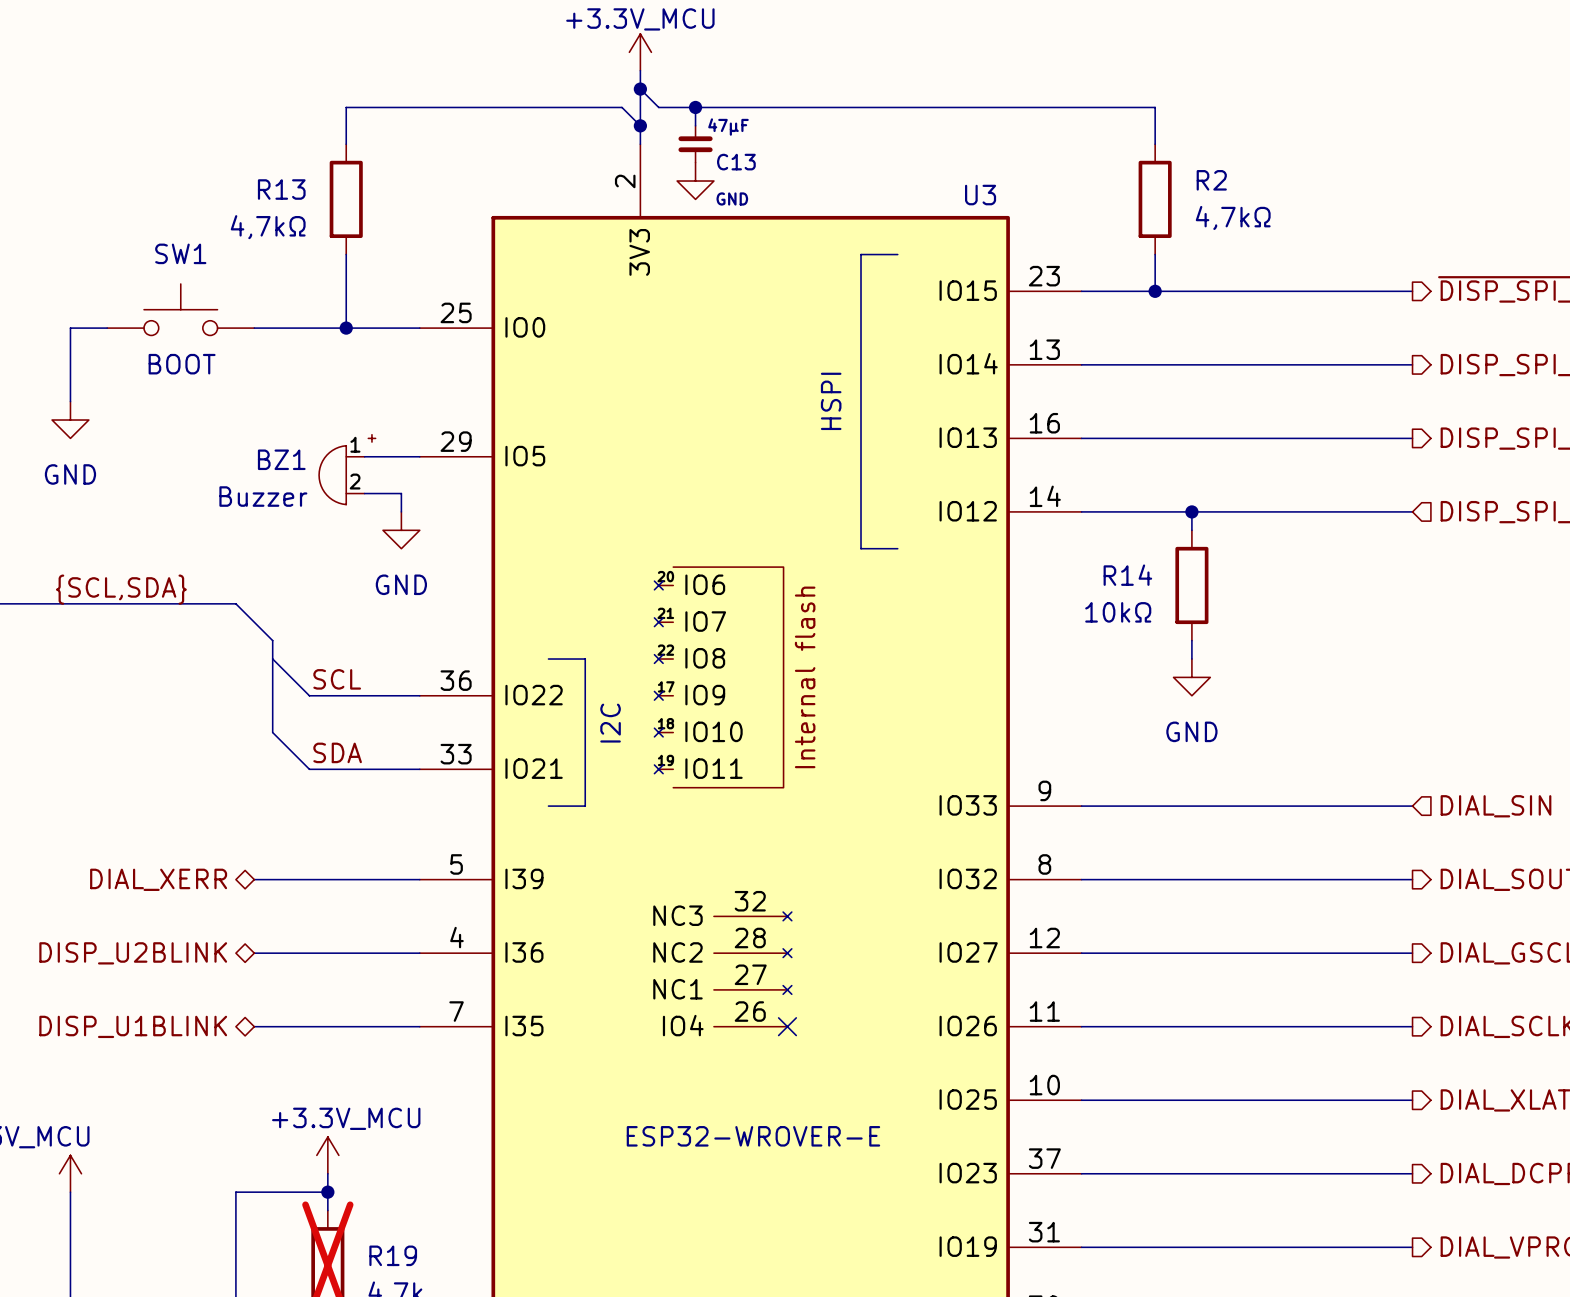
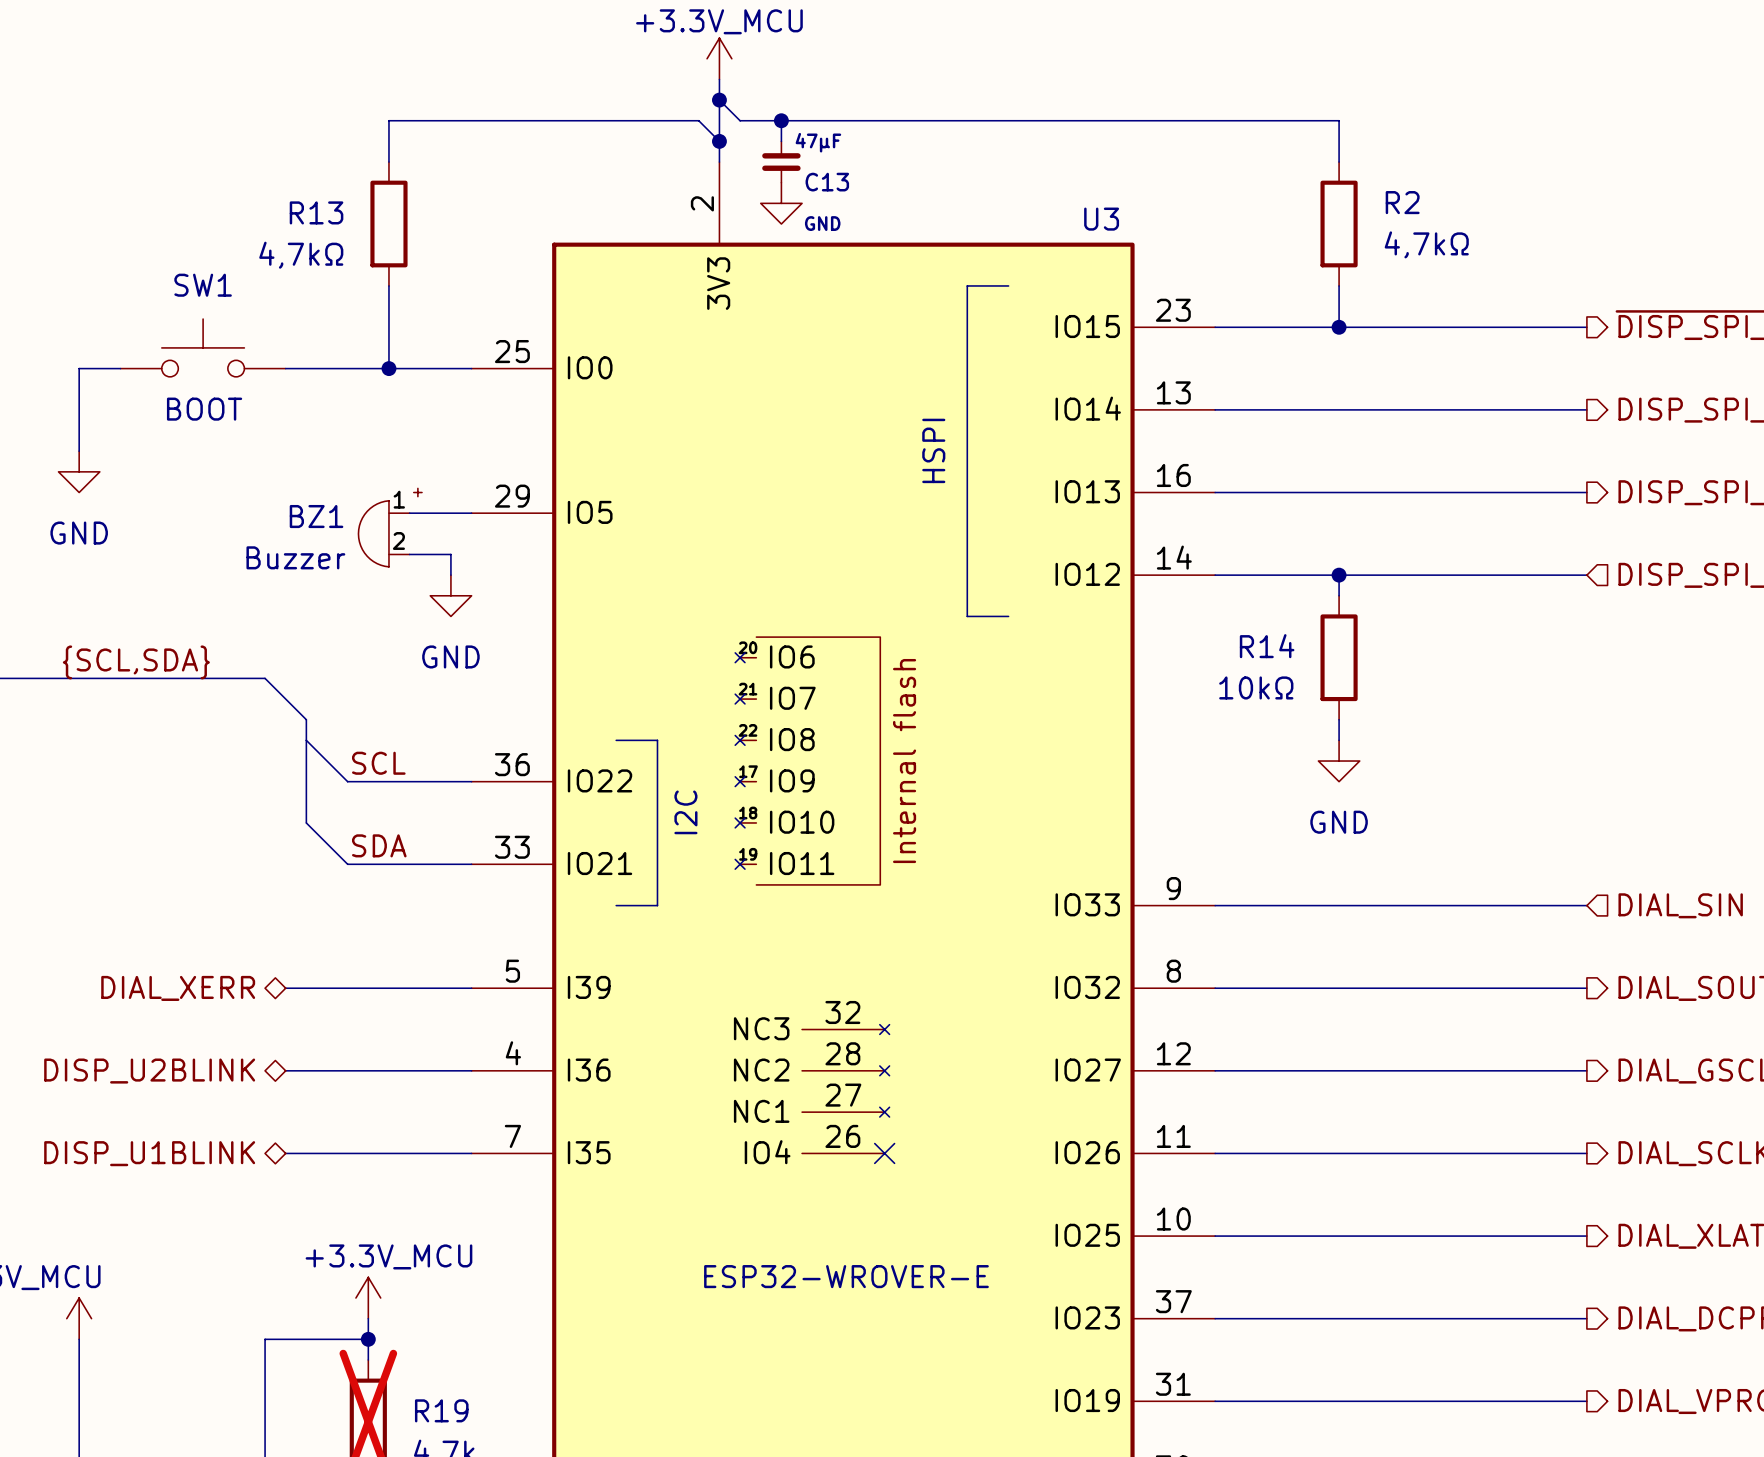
wire: (1155, 107) (1155, 144) -> (1297, 120) (1339, 120) (1339, 162)
R2 position: (1155, 199) -> (1339, 224)
wire: (1155, 254) (1155, 291) -> (1339, 285) (1339, 327)
junction position: (1155, 291) -> (1339, 327)

